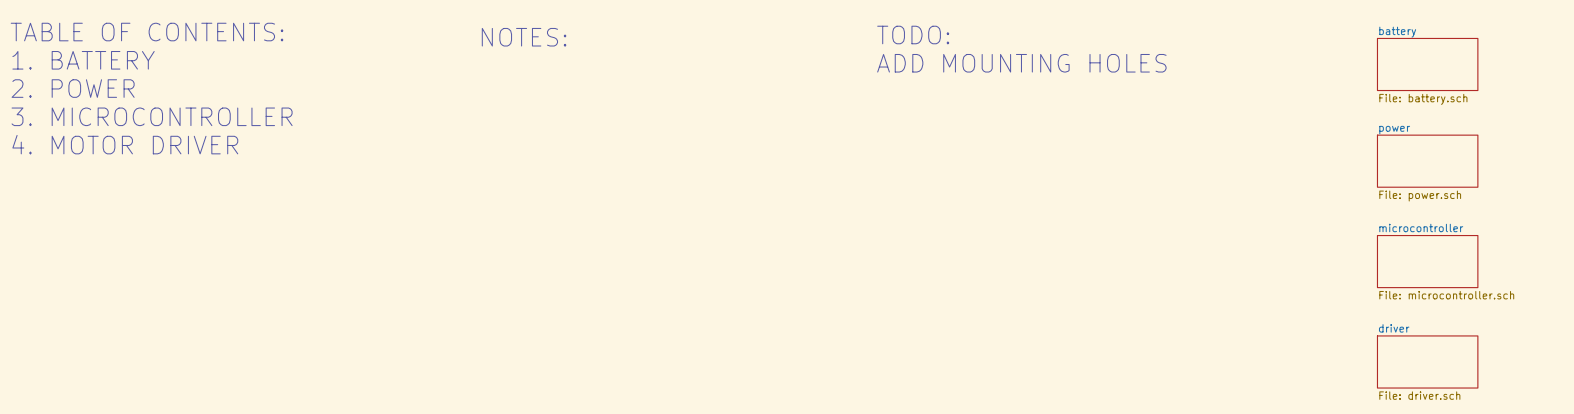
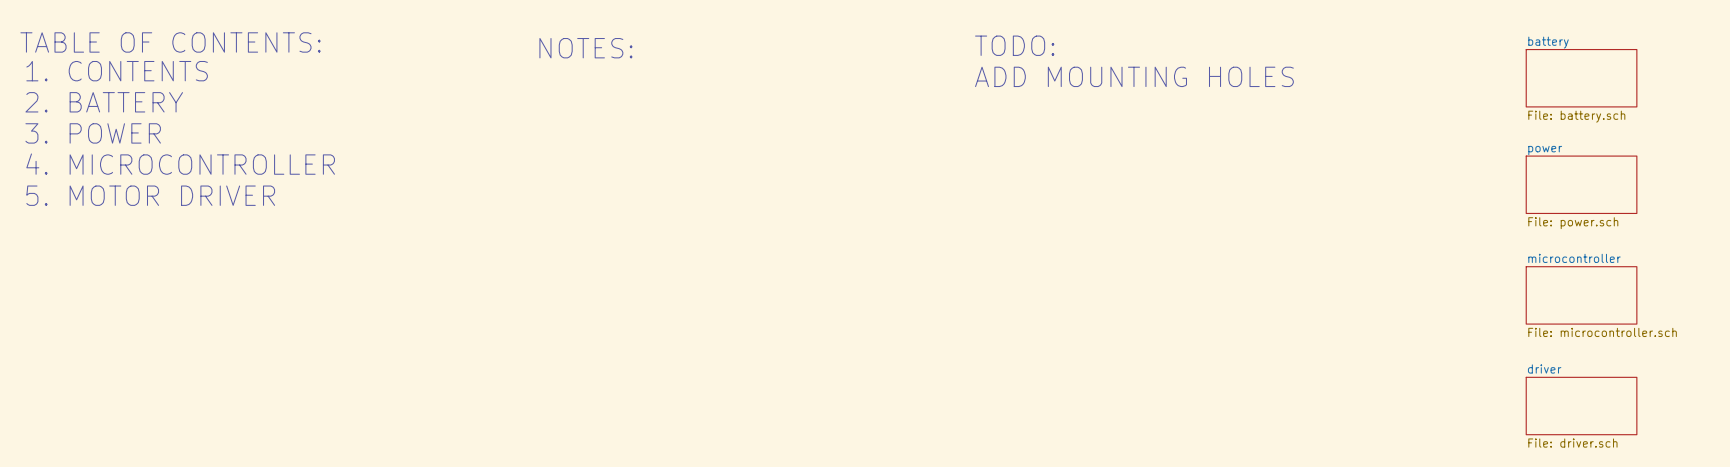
text: 1. BATTERY (83, 60) -> 1. CONTENTS (117, 71)
text: 2. POWER (73, 88) -> 2. BATTERY (104, 102)
text: 3. MICROCONTROLLER (152, 116) -> 3. POWER (93, 133)
text: 4. MOTOR DRIVER (125, 144) -> 4. MICROCONTROLLER (180, 164)
text: none -> 5. MOTOR DRIVER (150, 195)

